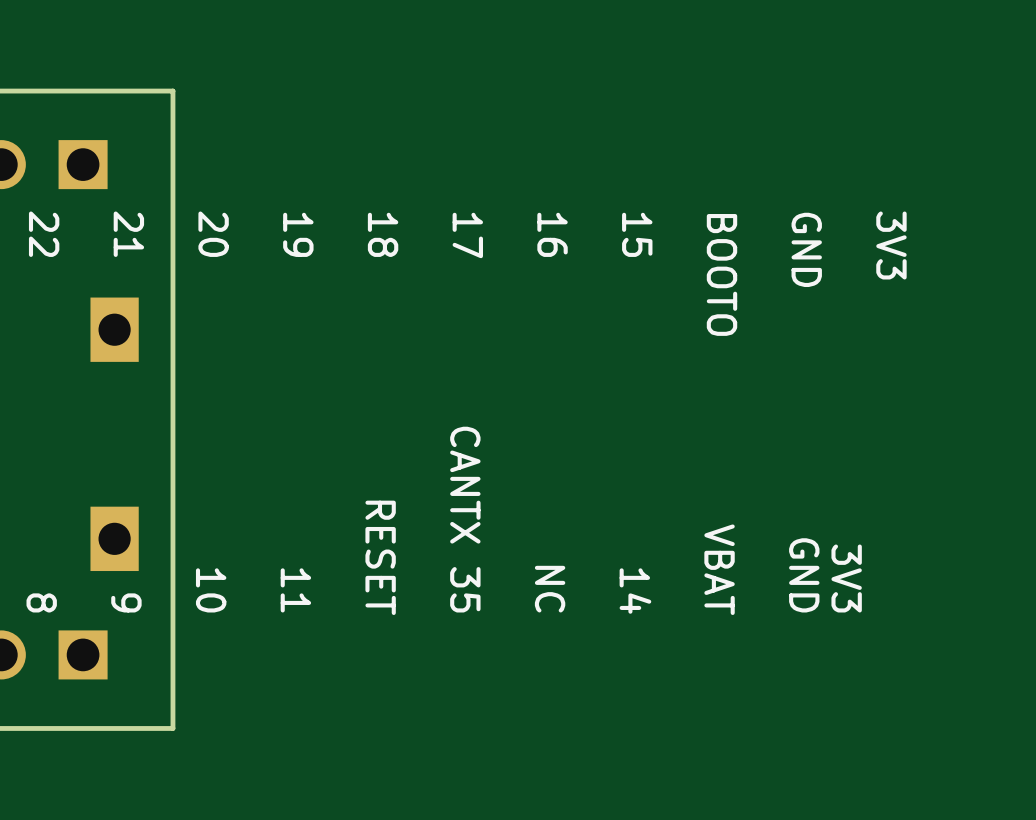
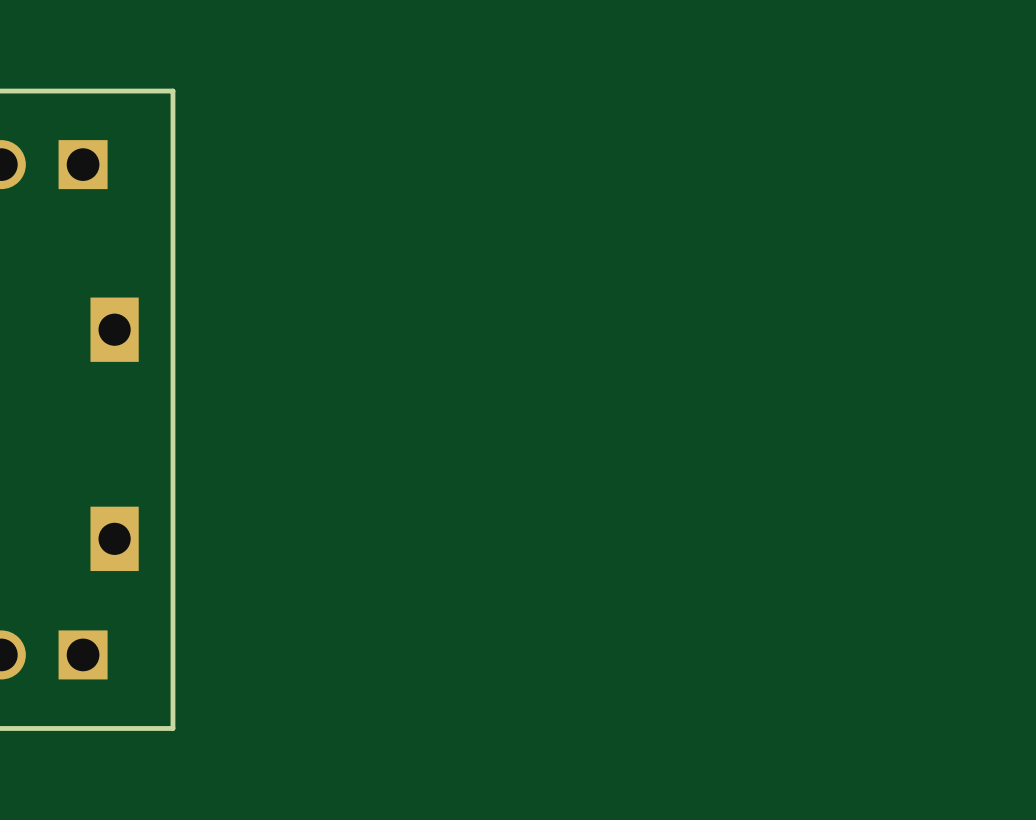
text: 22 (44, 234) -> none
text: 21 (128, 234) -> none
text: 20 (213, 234) -> none
text: 19 (298, 234) -> none
text: 18 (383, 234) -> none
text: 16 (552, 234) -> none
text: 15 (637, 234) -> none
text: 17 (467, 235) -> none
text: 3V3 (891, 245) -> none
text: GND (806, 249) -> none
text: BOOTO (721, 274) -> none
text: CANTX 35 (465, 519) -> none
text: RESET (380, 557) -> none
text: VBAT (719, 569) -> none
text: GND (804, 575) -> none
text: 3V3 (846, 578) -> none
text: NC (550, 589) -> none
text: 10 (211, 590) -> none
text: 11 (295, 590) -> none
text: 14 (635, 591) -> none
text: 8 (41, 602) -> none
text: 9 (126, 602) -> none

